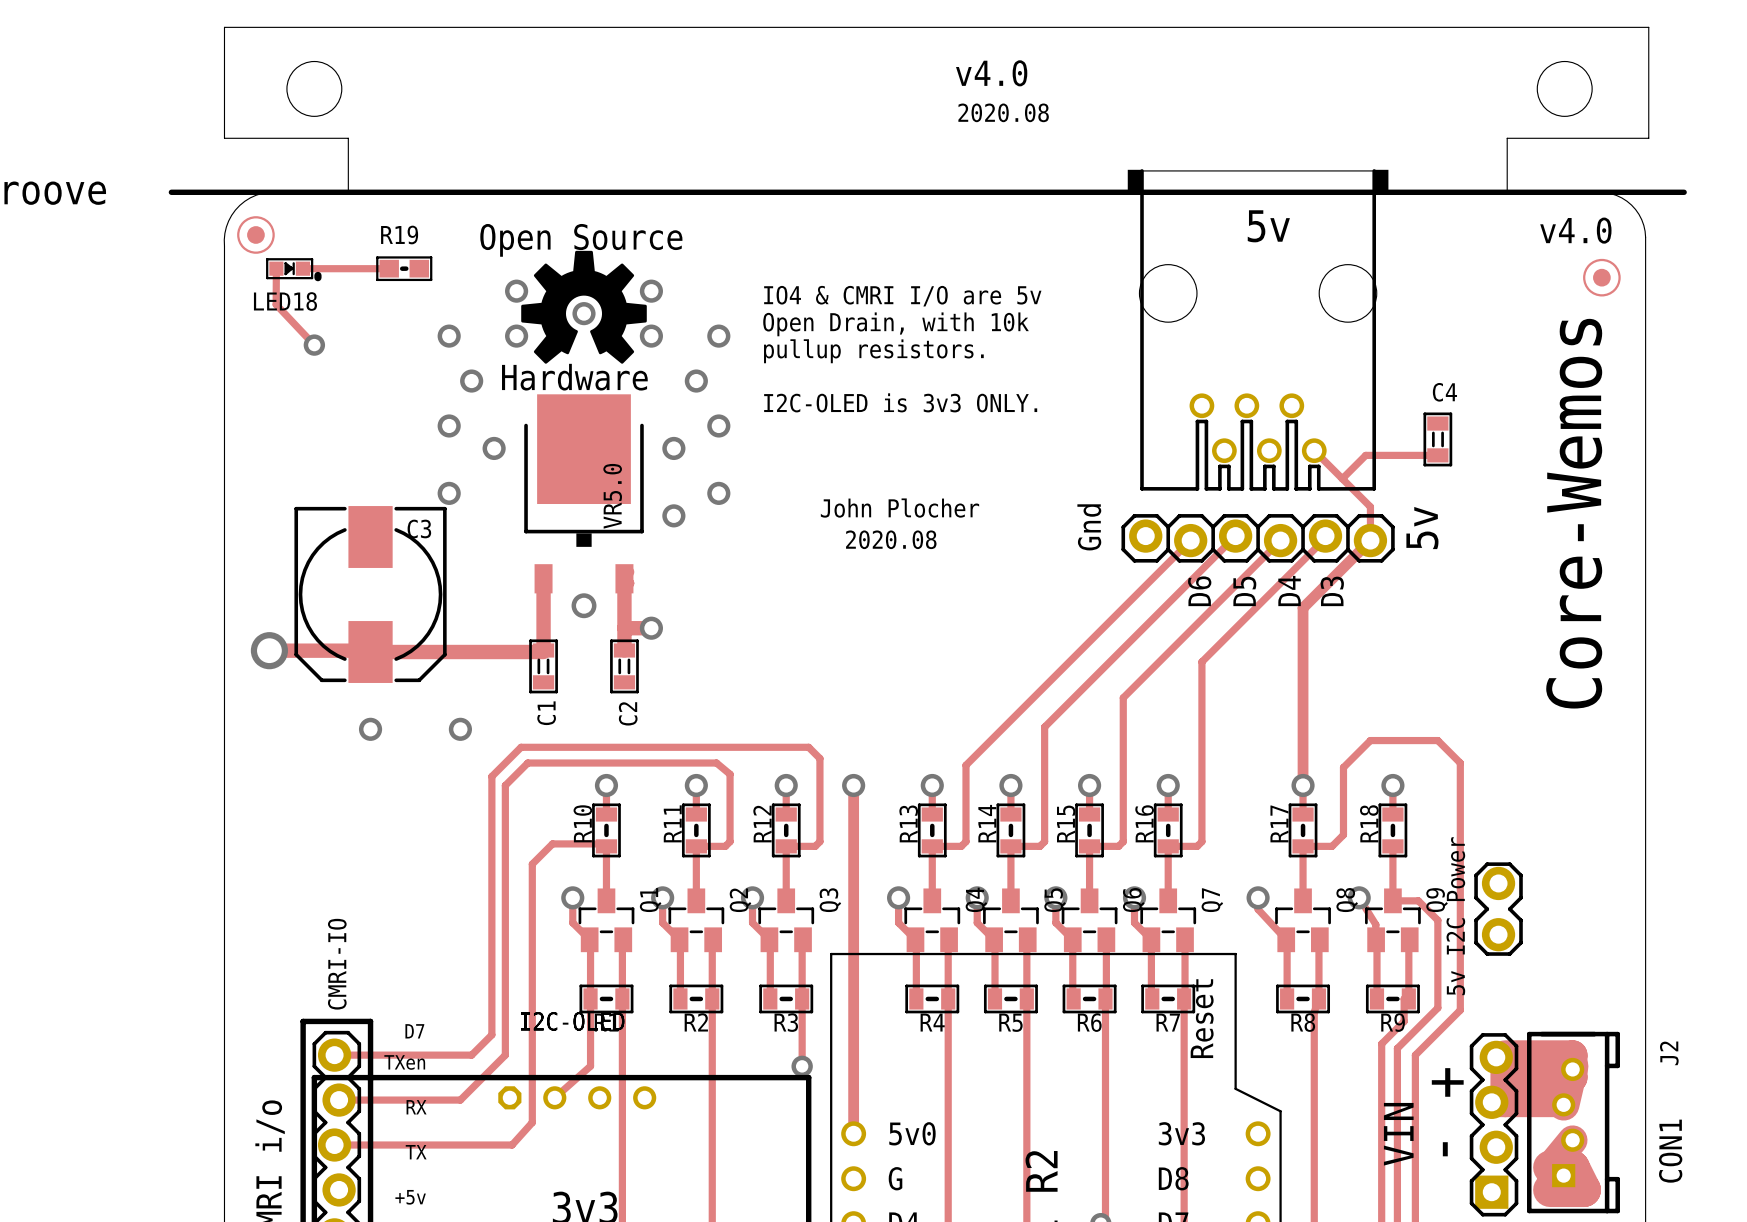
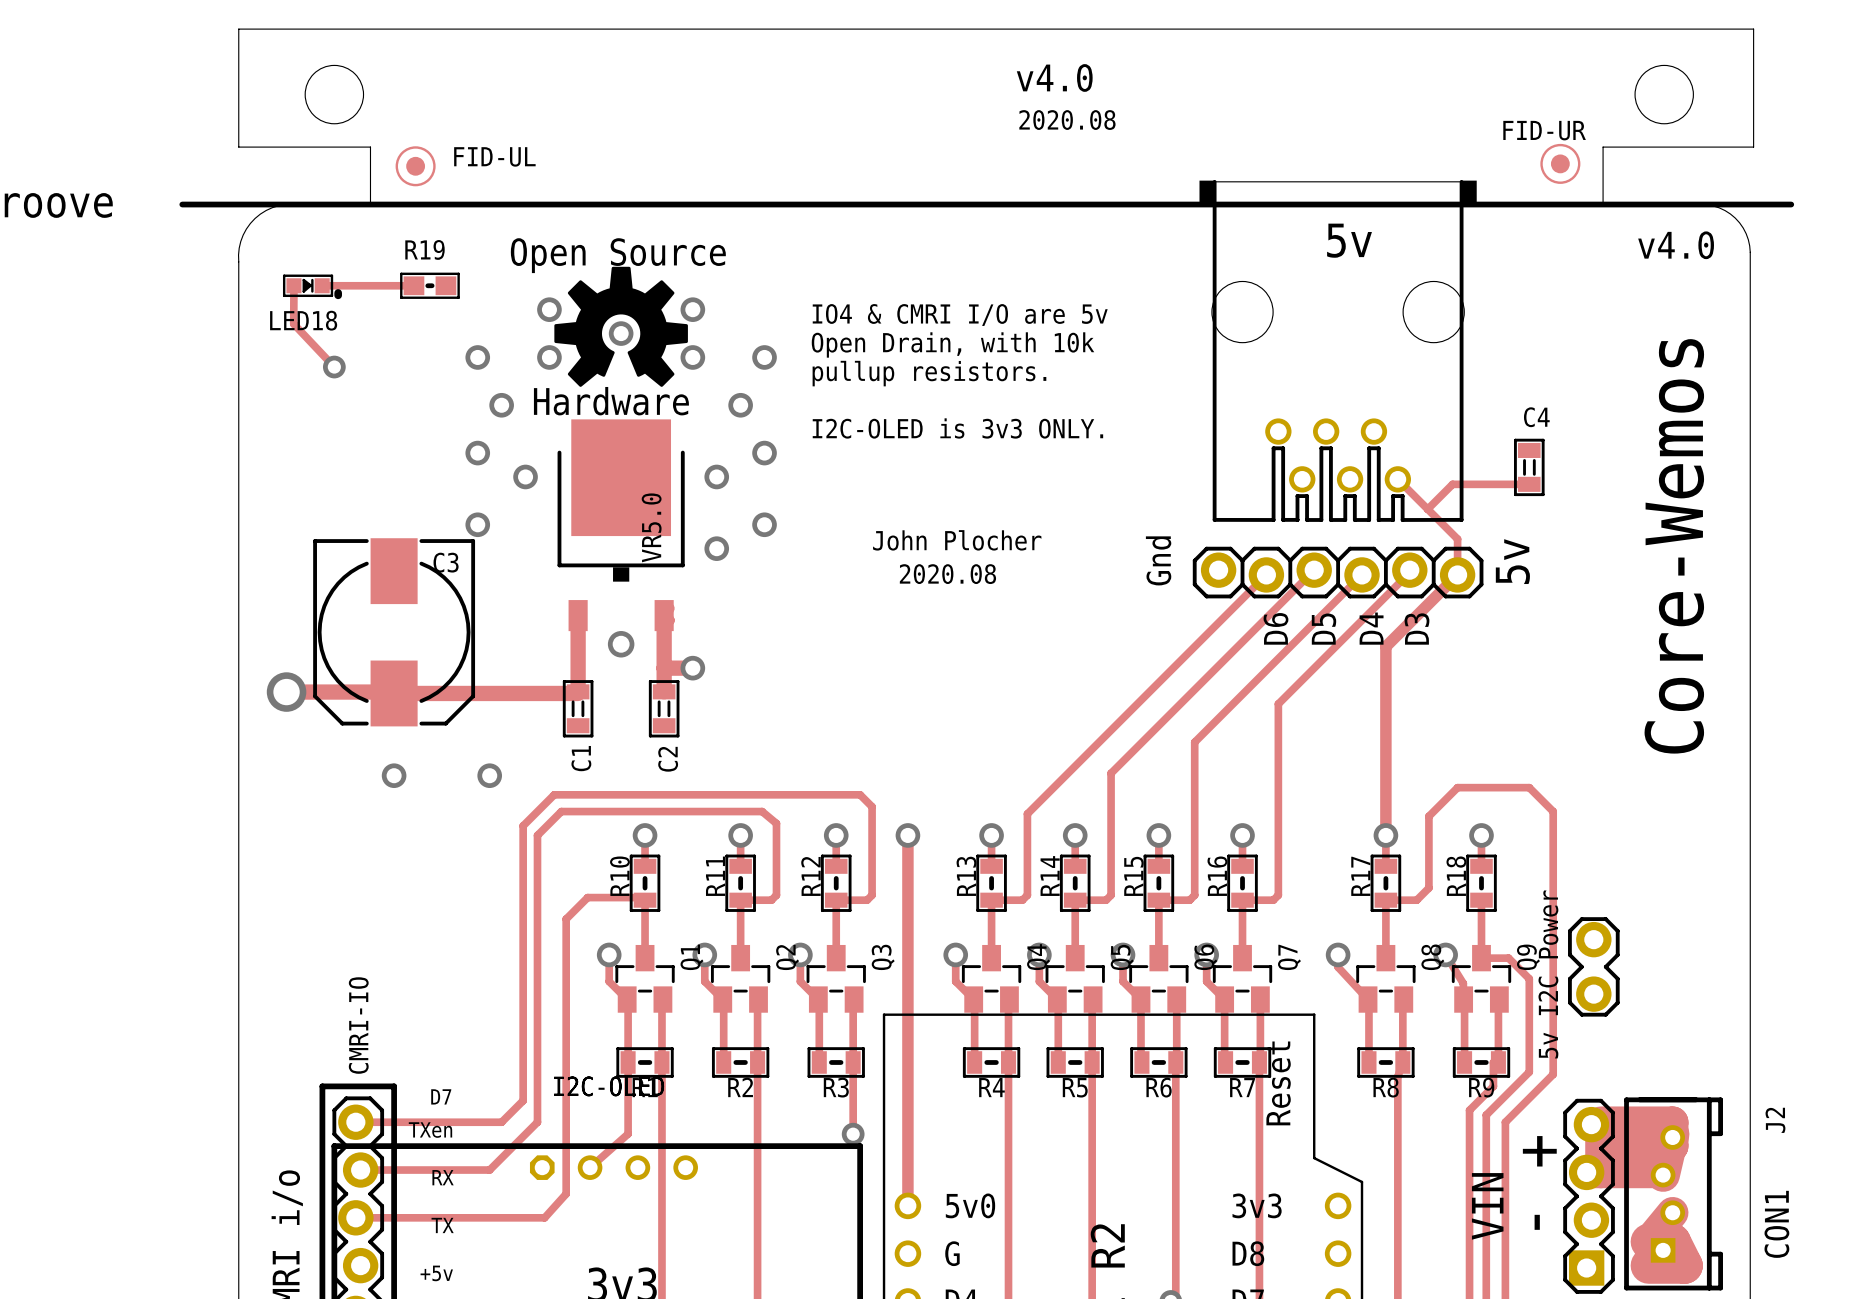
FID-UR: none -> (1560, 163)
FID-UL: none -> (415, 166)
part: (255, 234) -> none
part: (1601, 277) -> none

